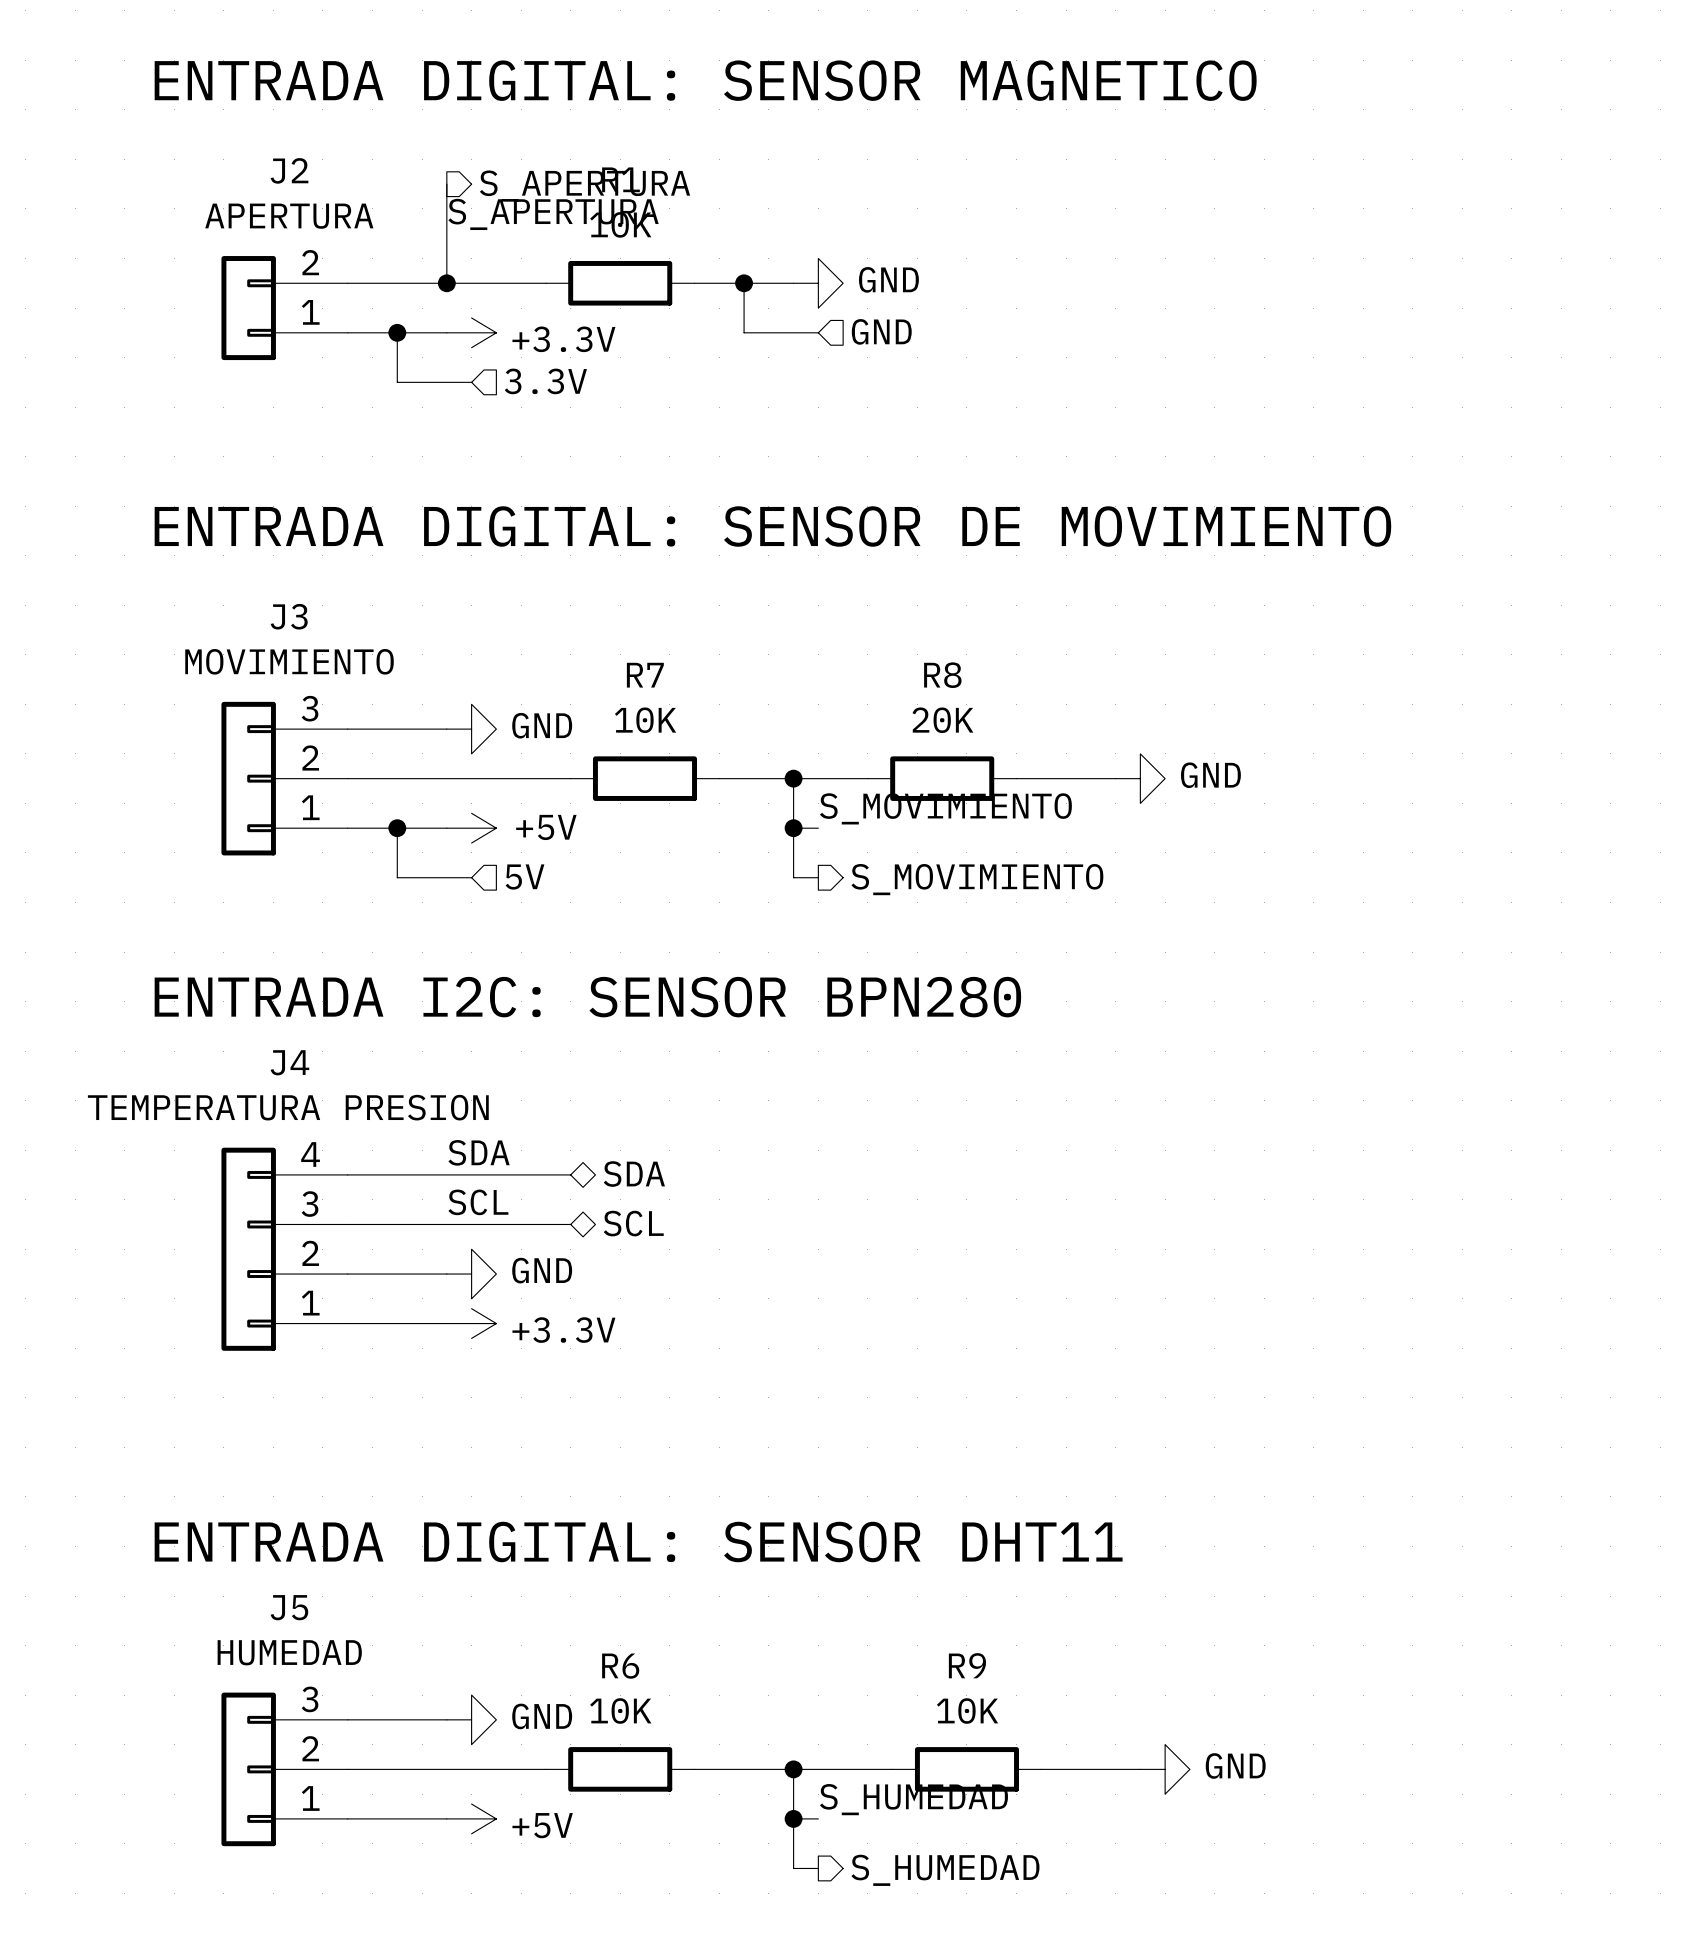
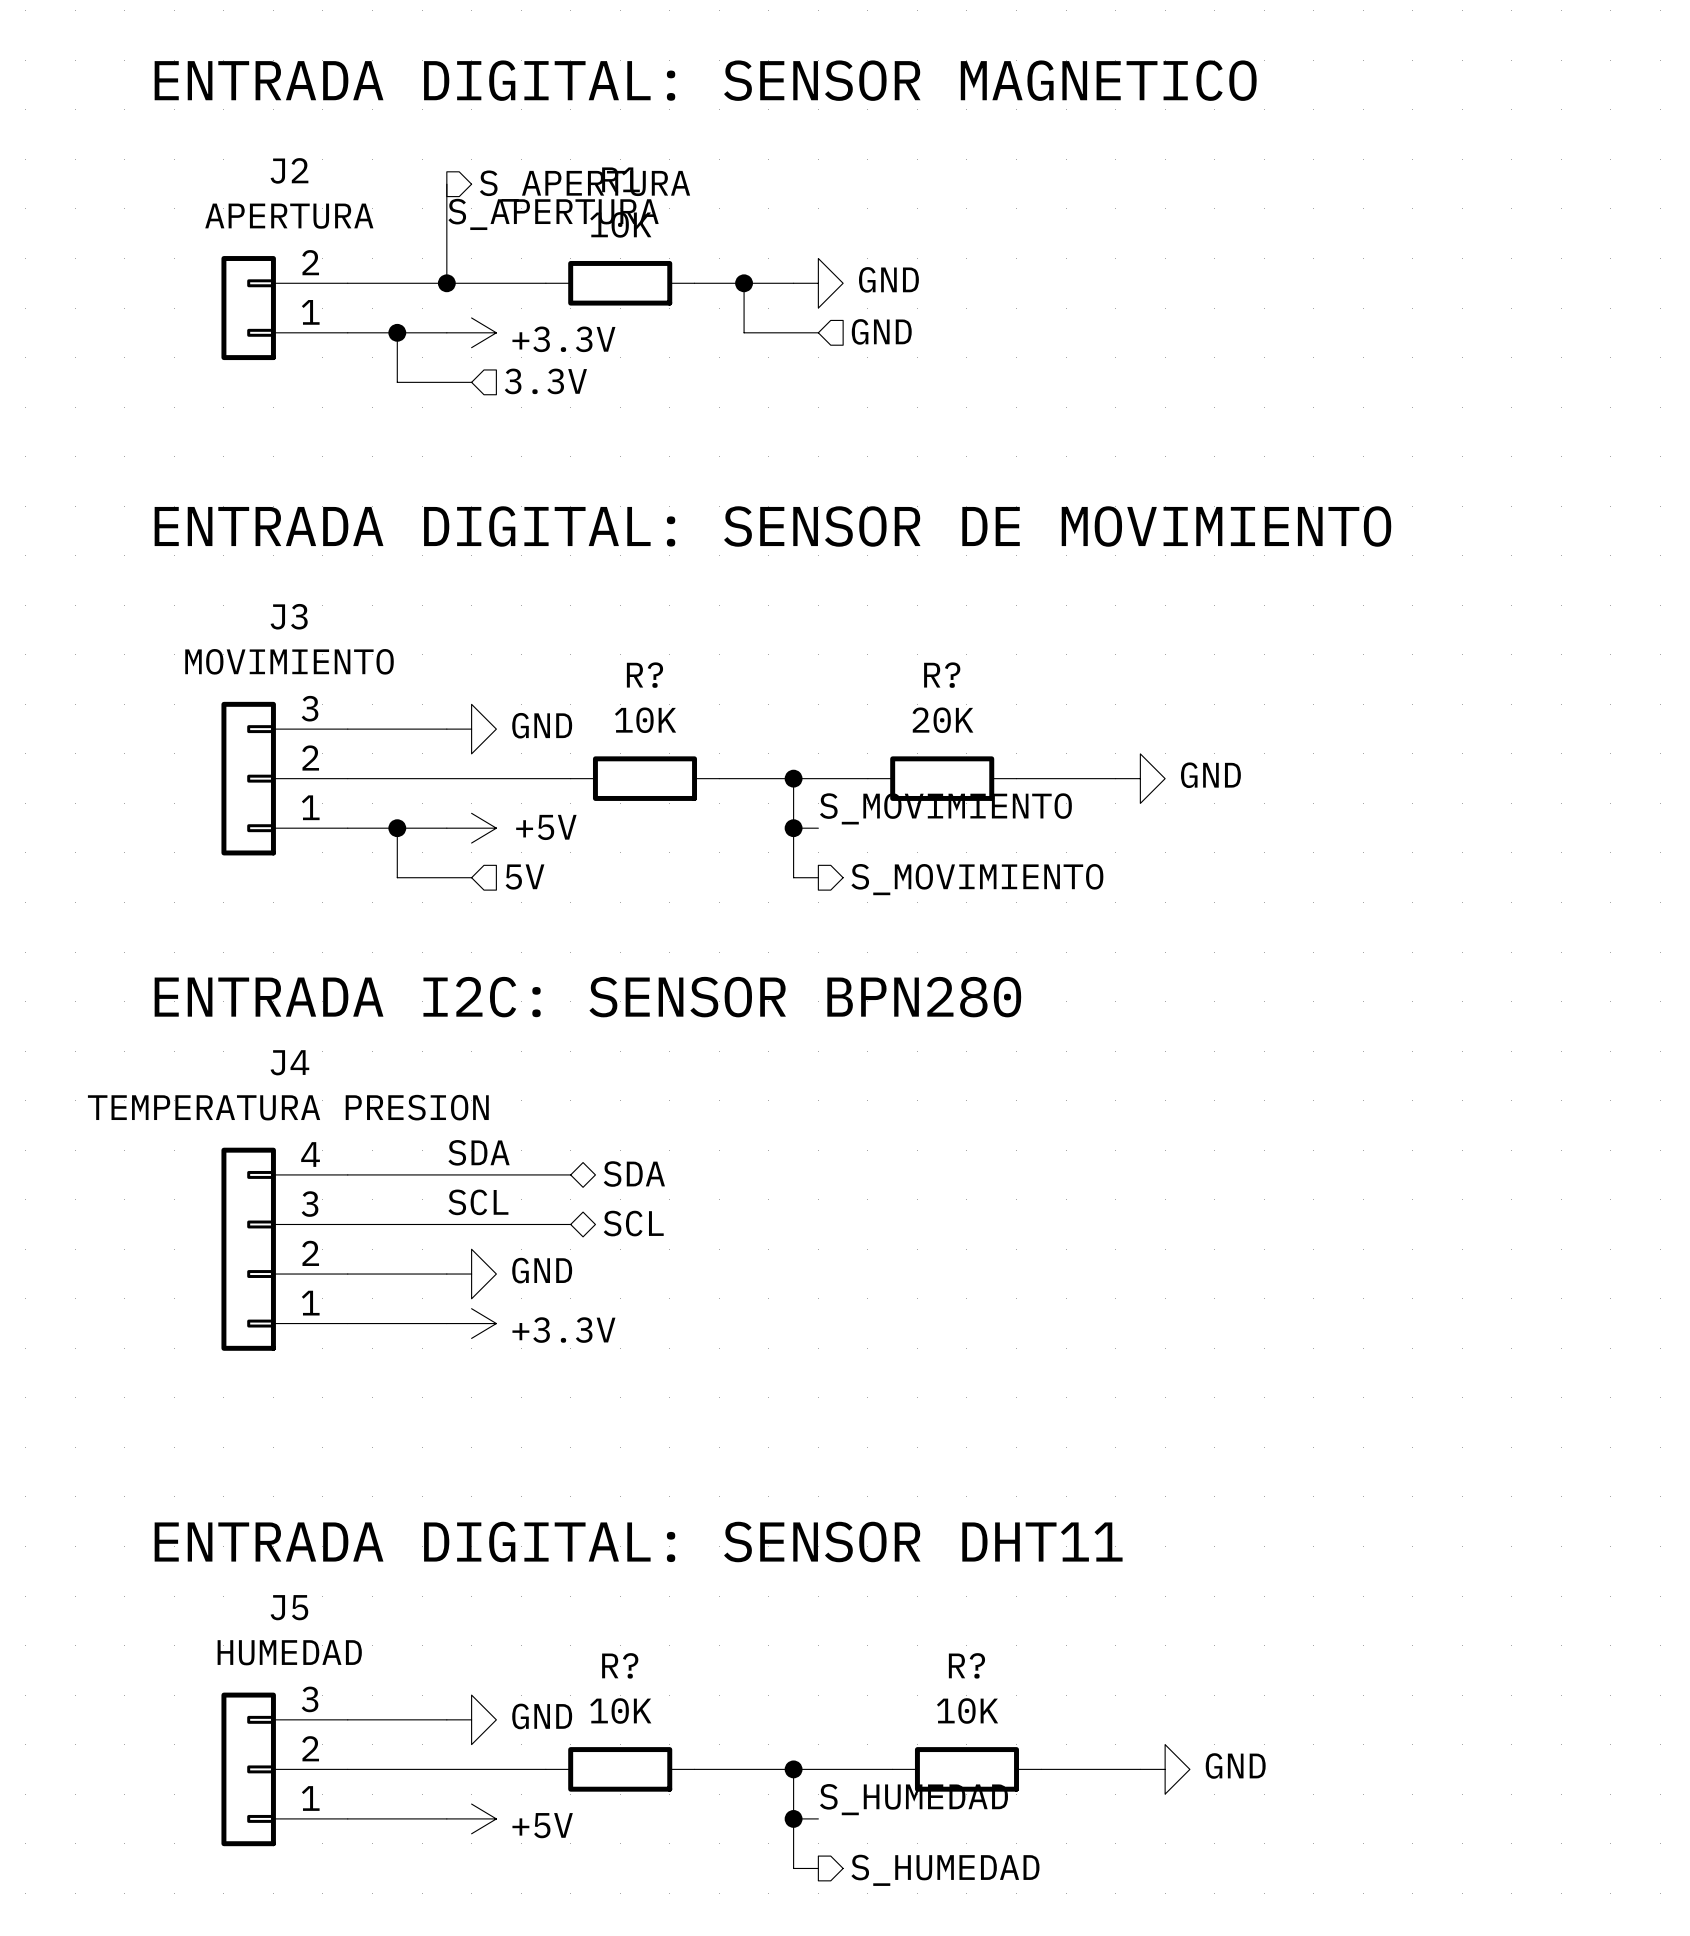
R7 name: R7 (645, 675) -> R? (644, 675)
R8 name: R8 (942, 675) -> R? (942, 675)
R9 name: R9 (967, 1665) -> R? (966, 1665)
R6 name: R6 (620, 1666) -> R? (620, 1665)

